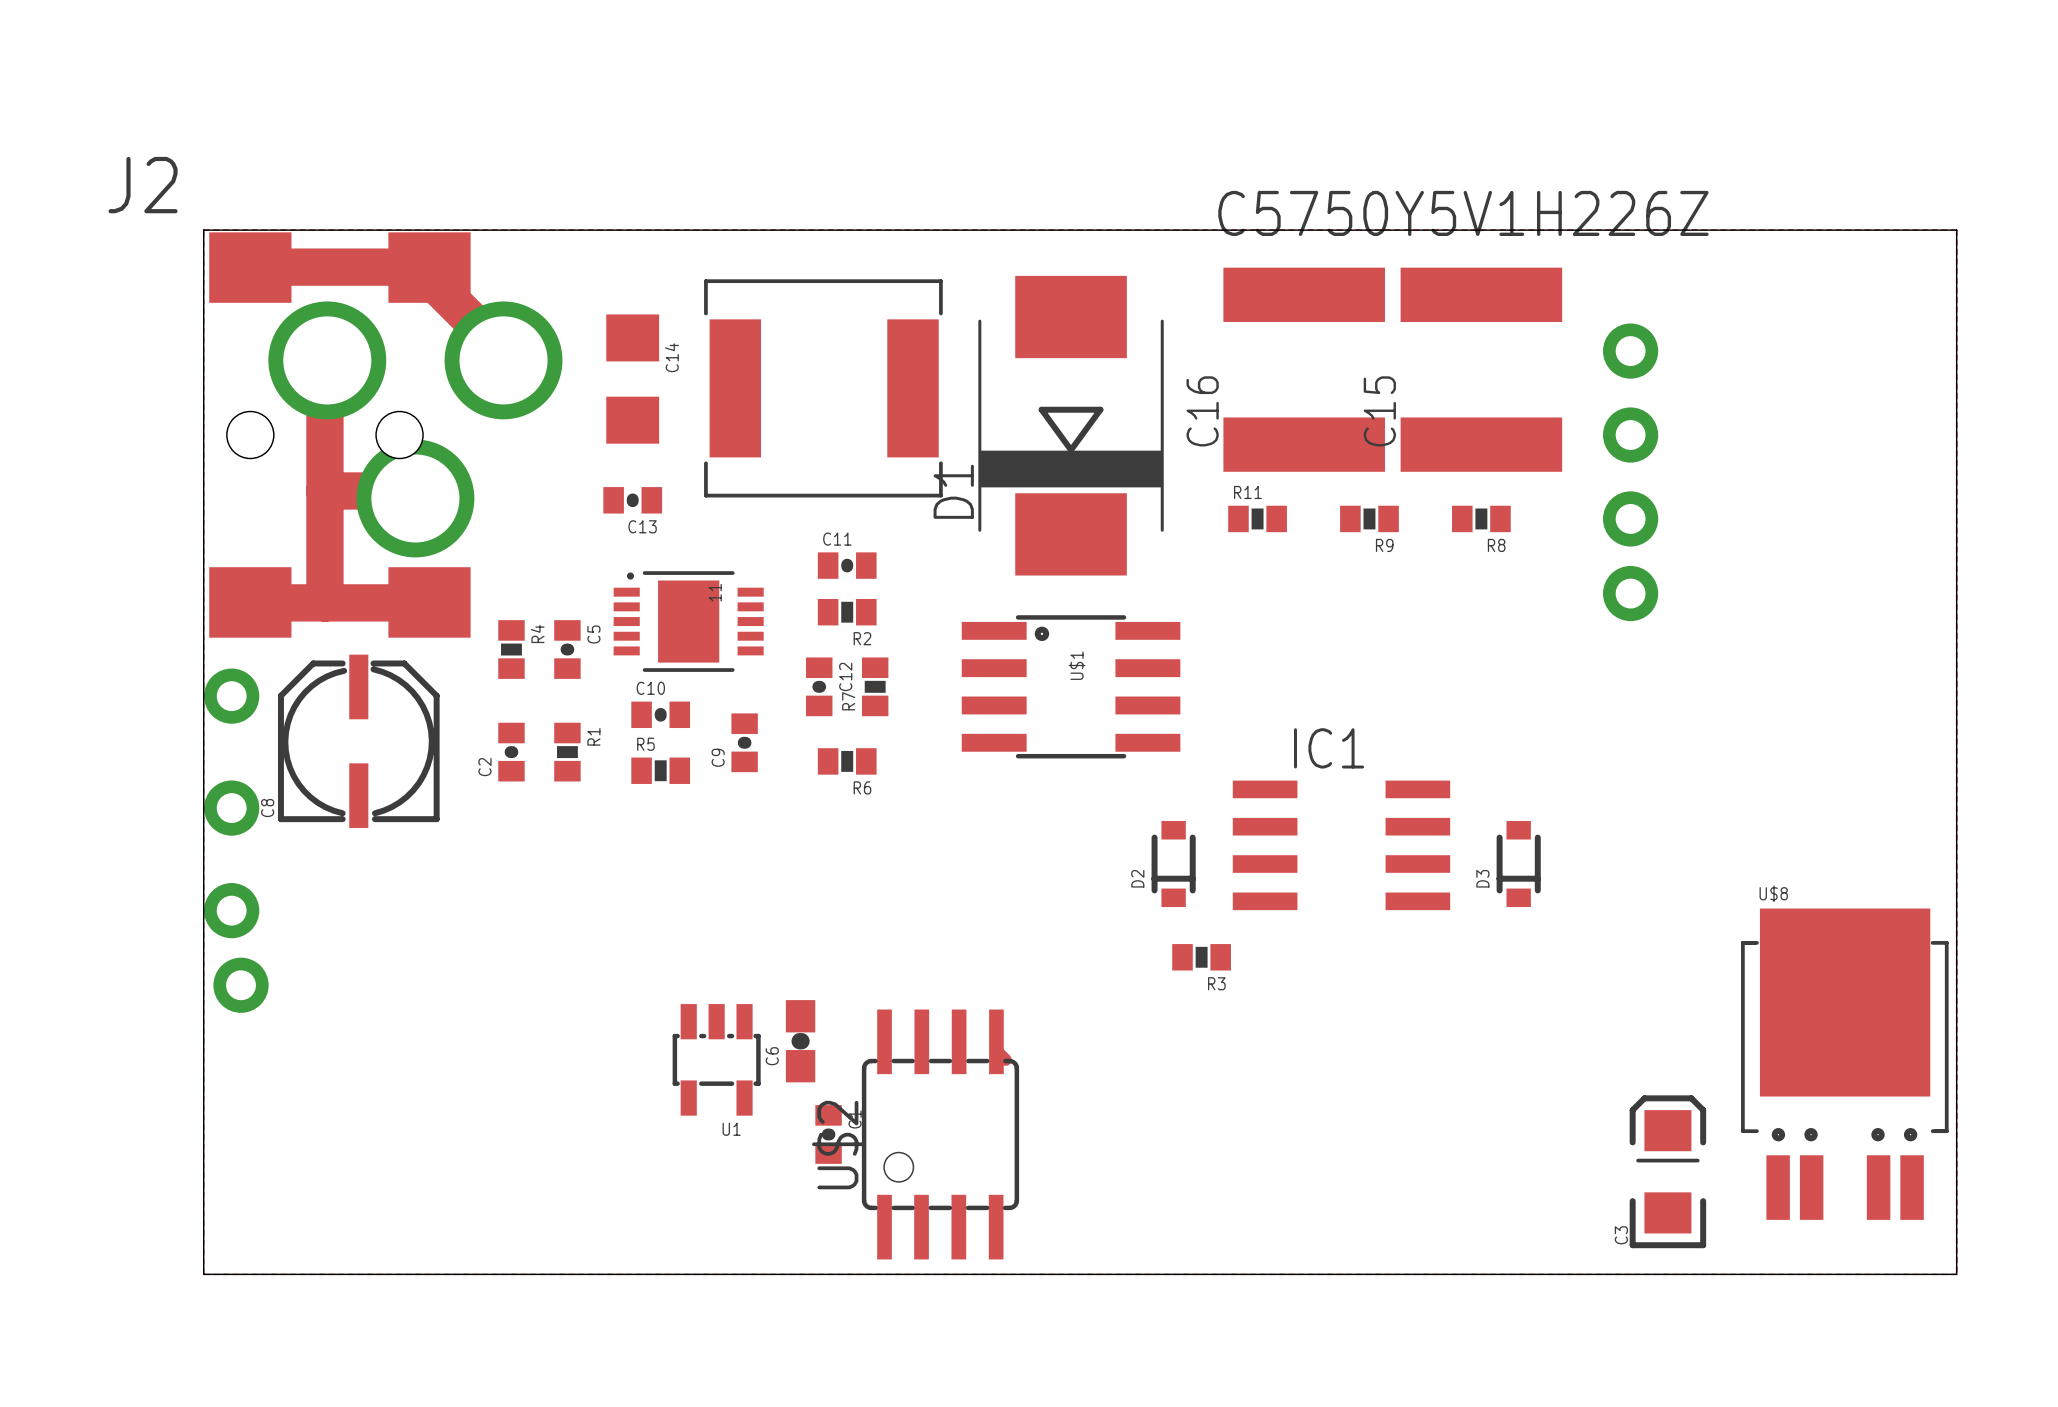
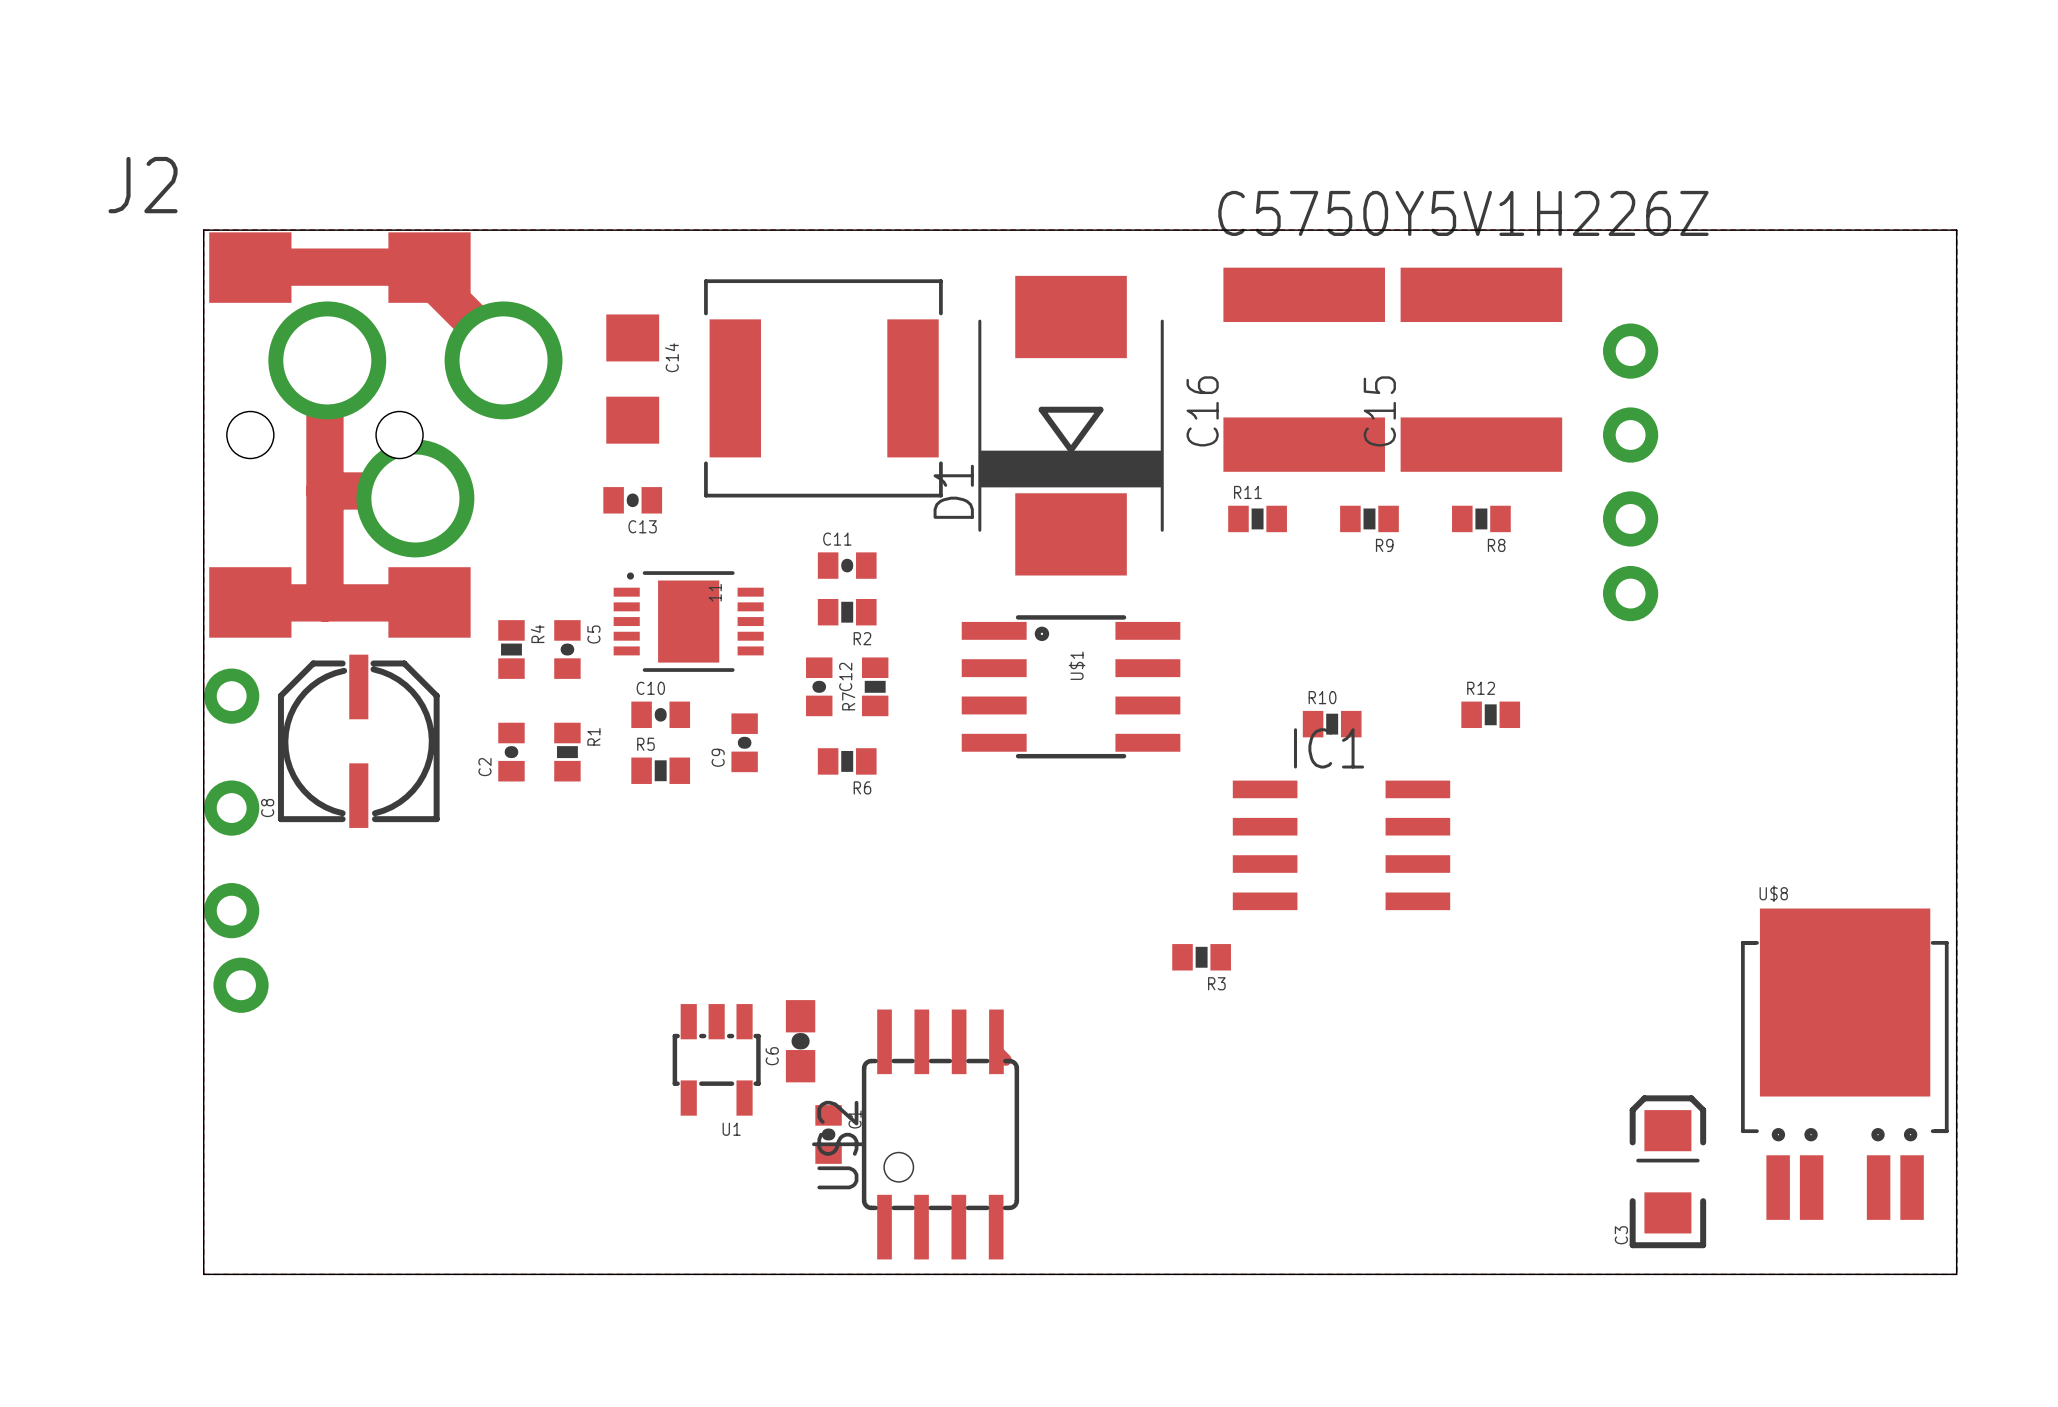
R12: none -> (1490, 714)
R10: none -> (1332, 724)
D2: (1173, 864) -> none
D3: (1518, 864) -> none

